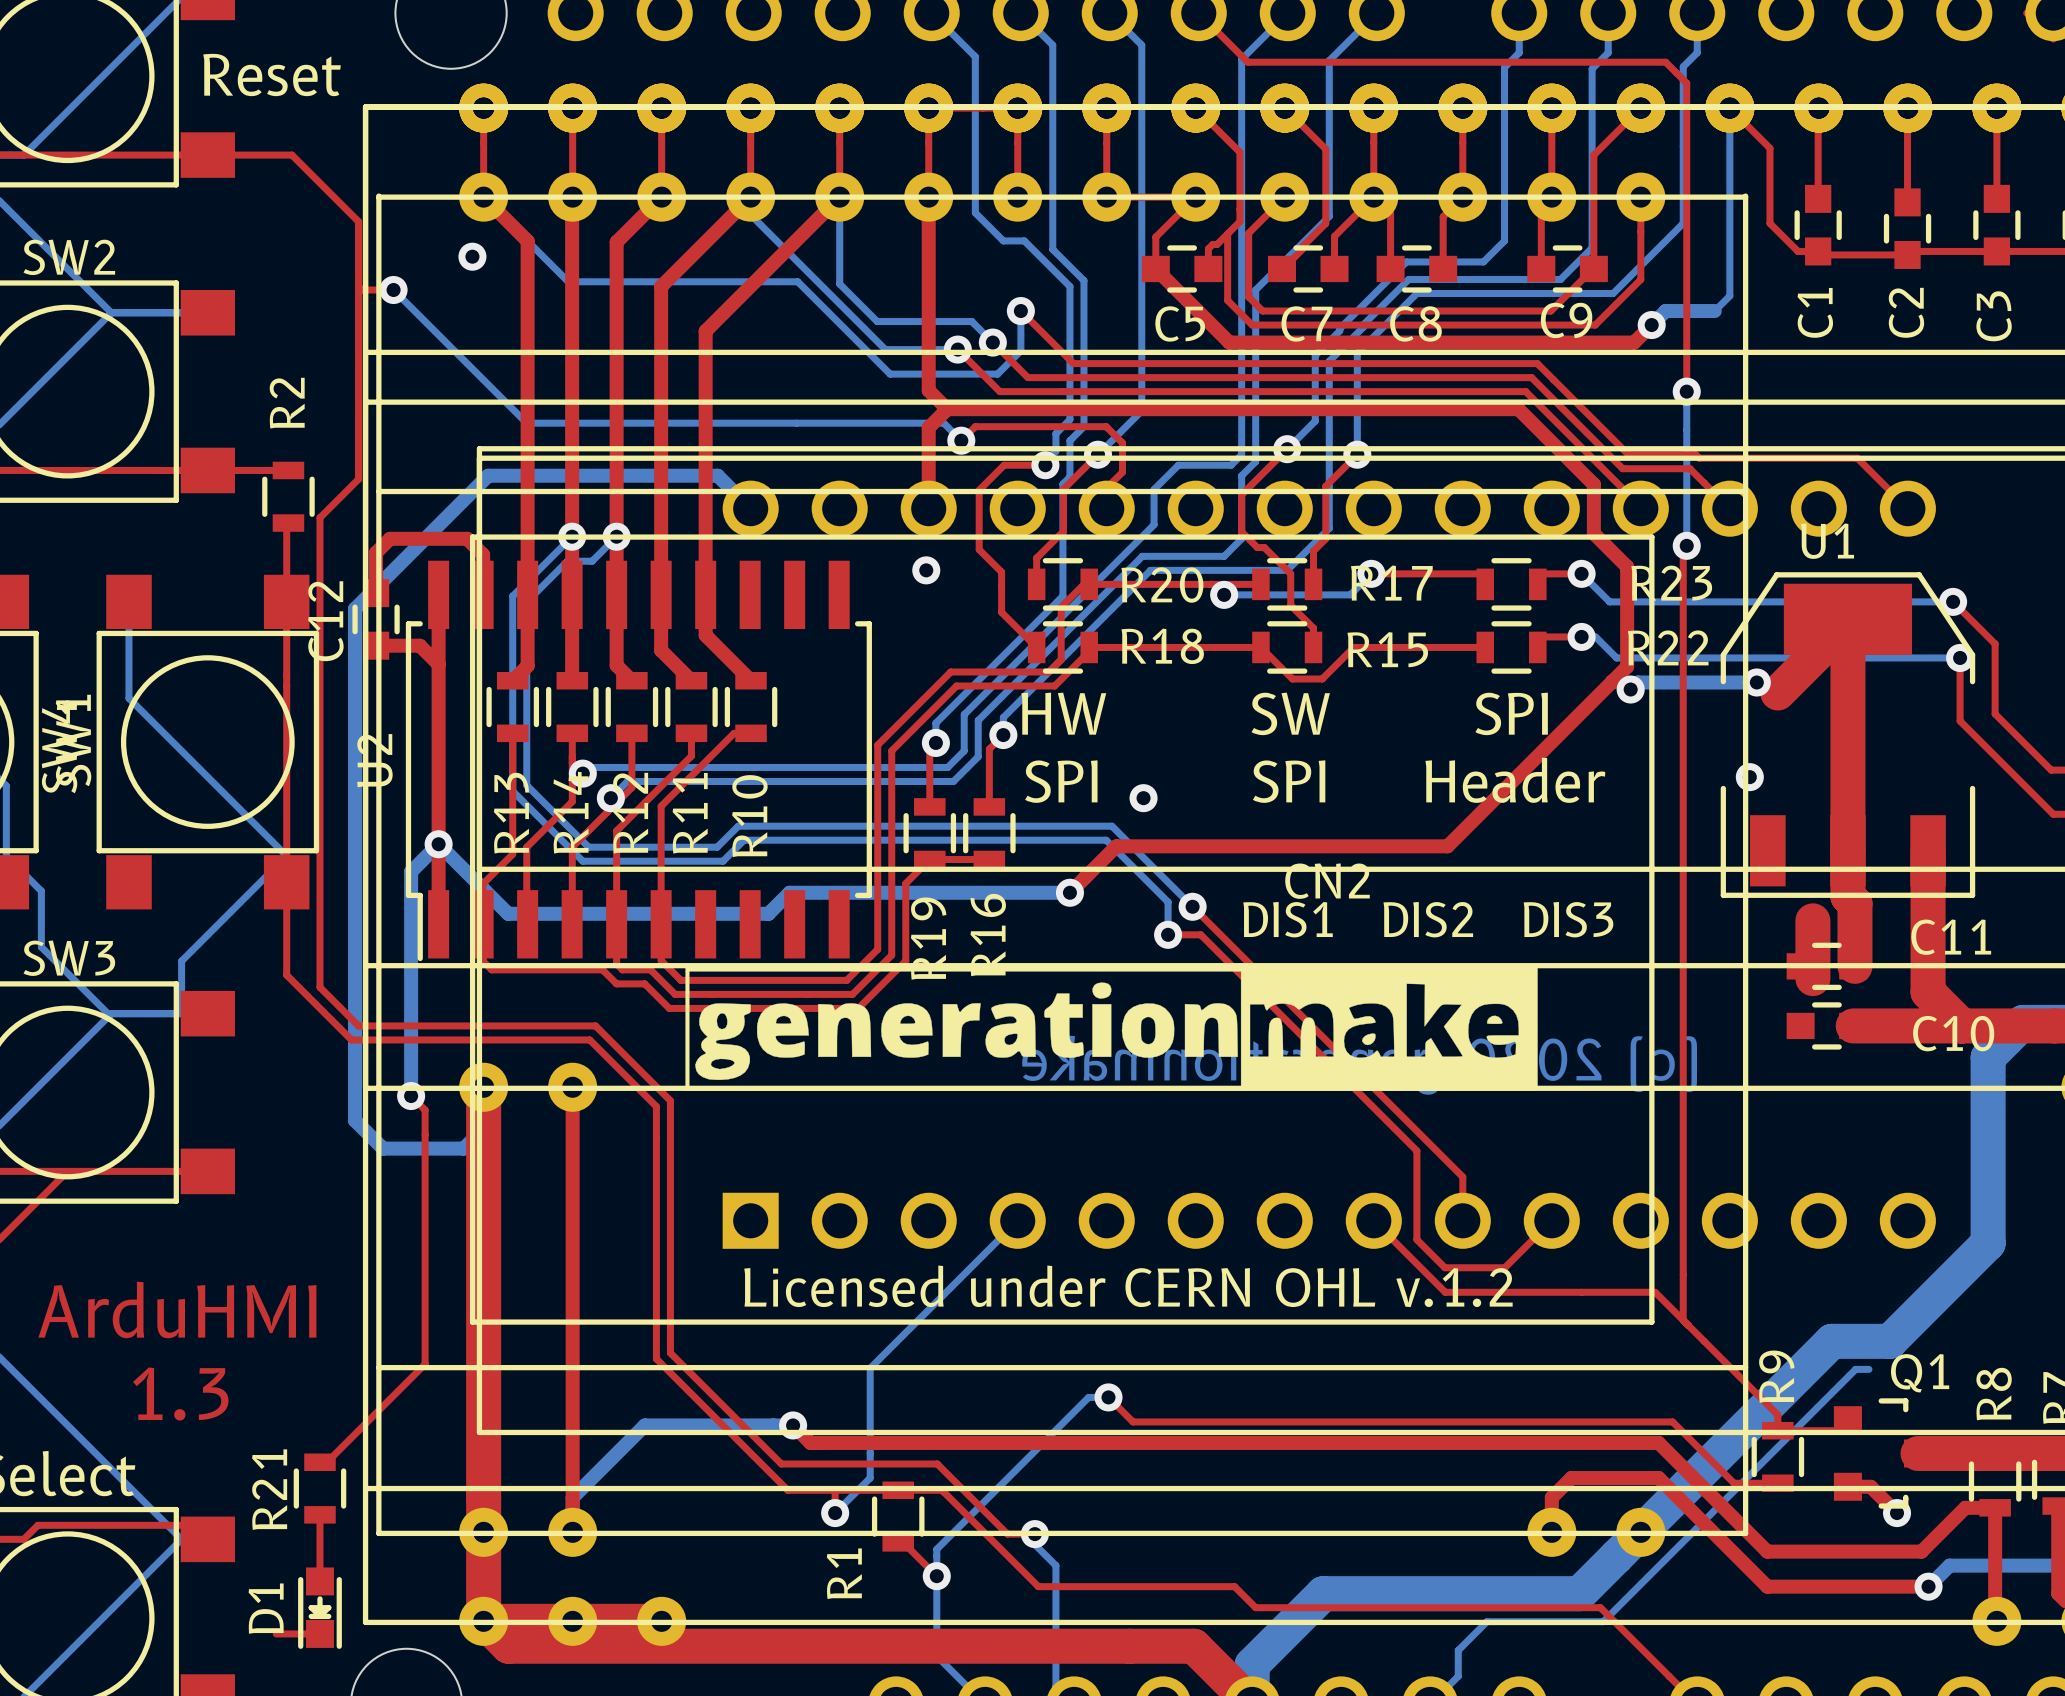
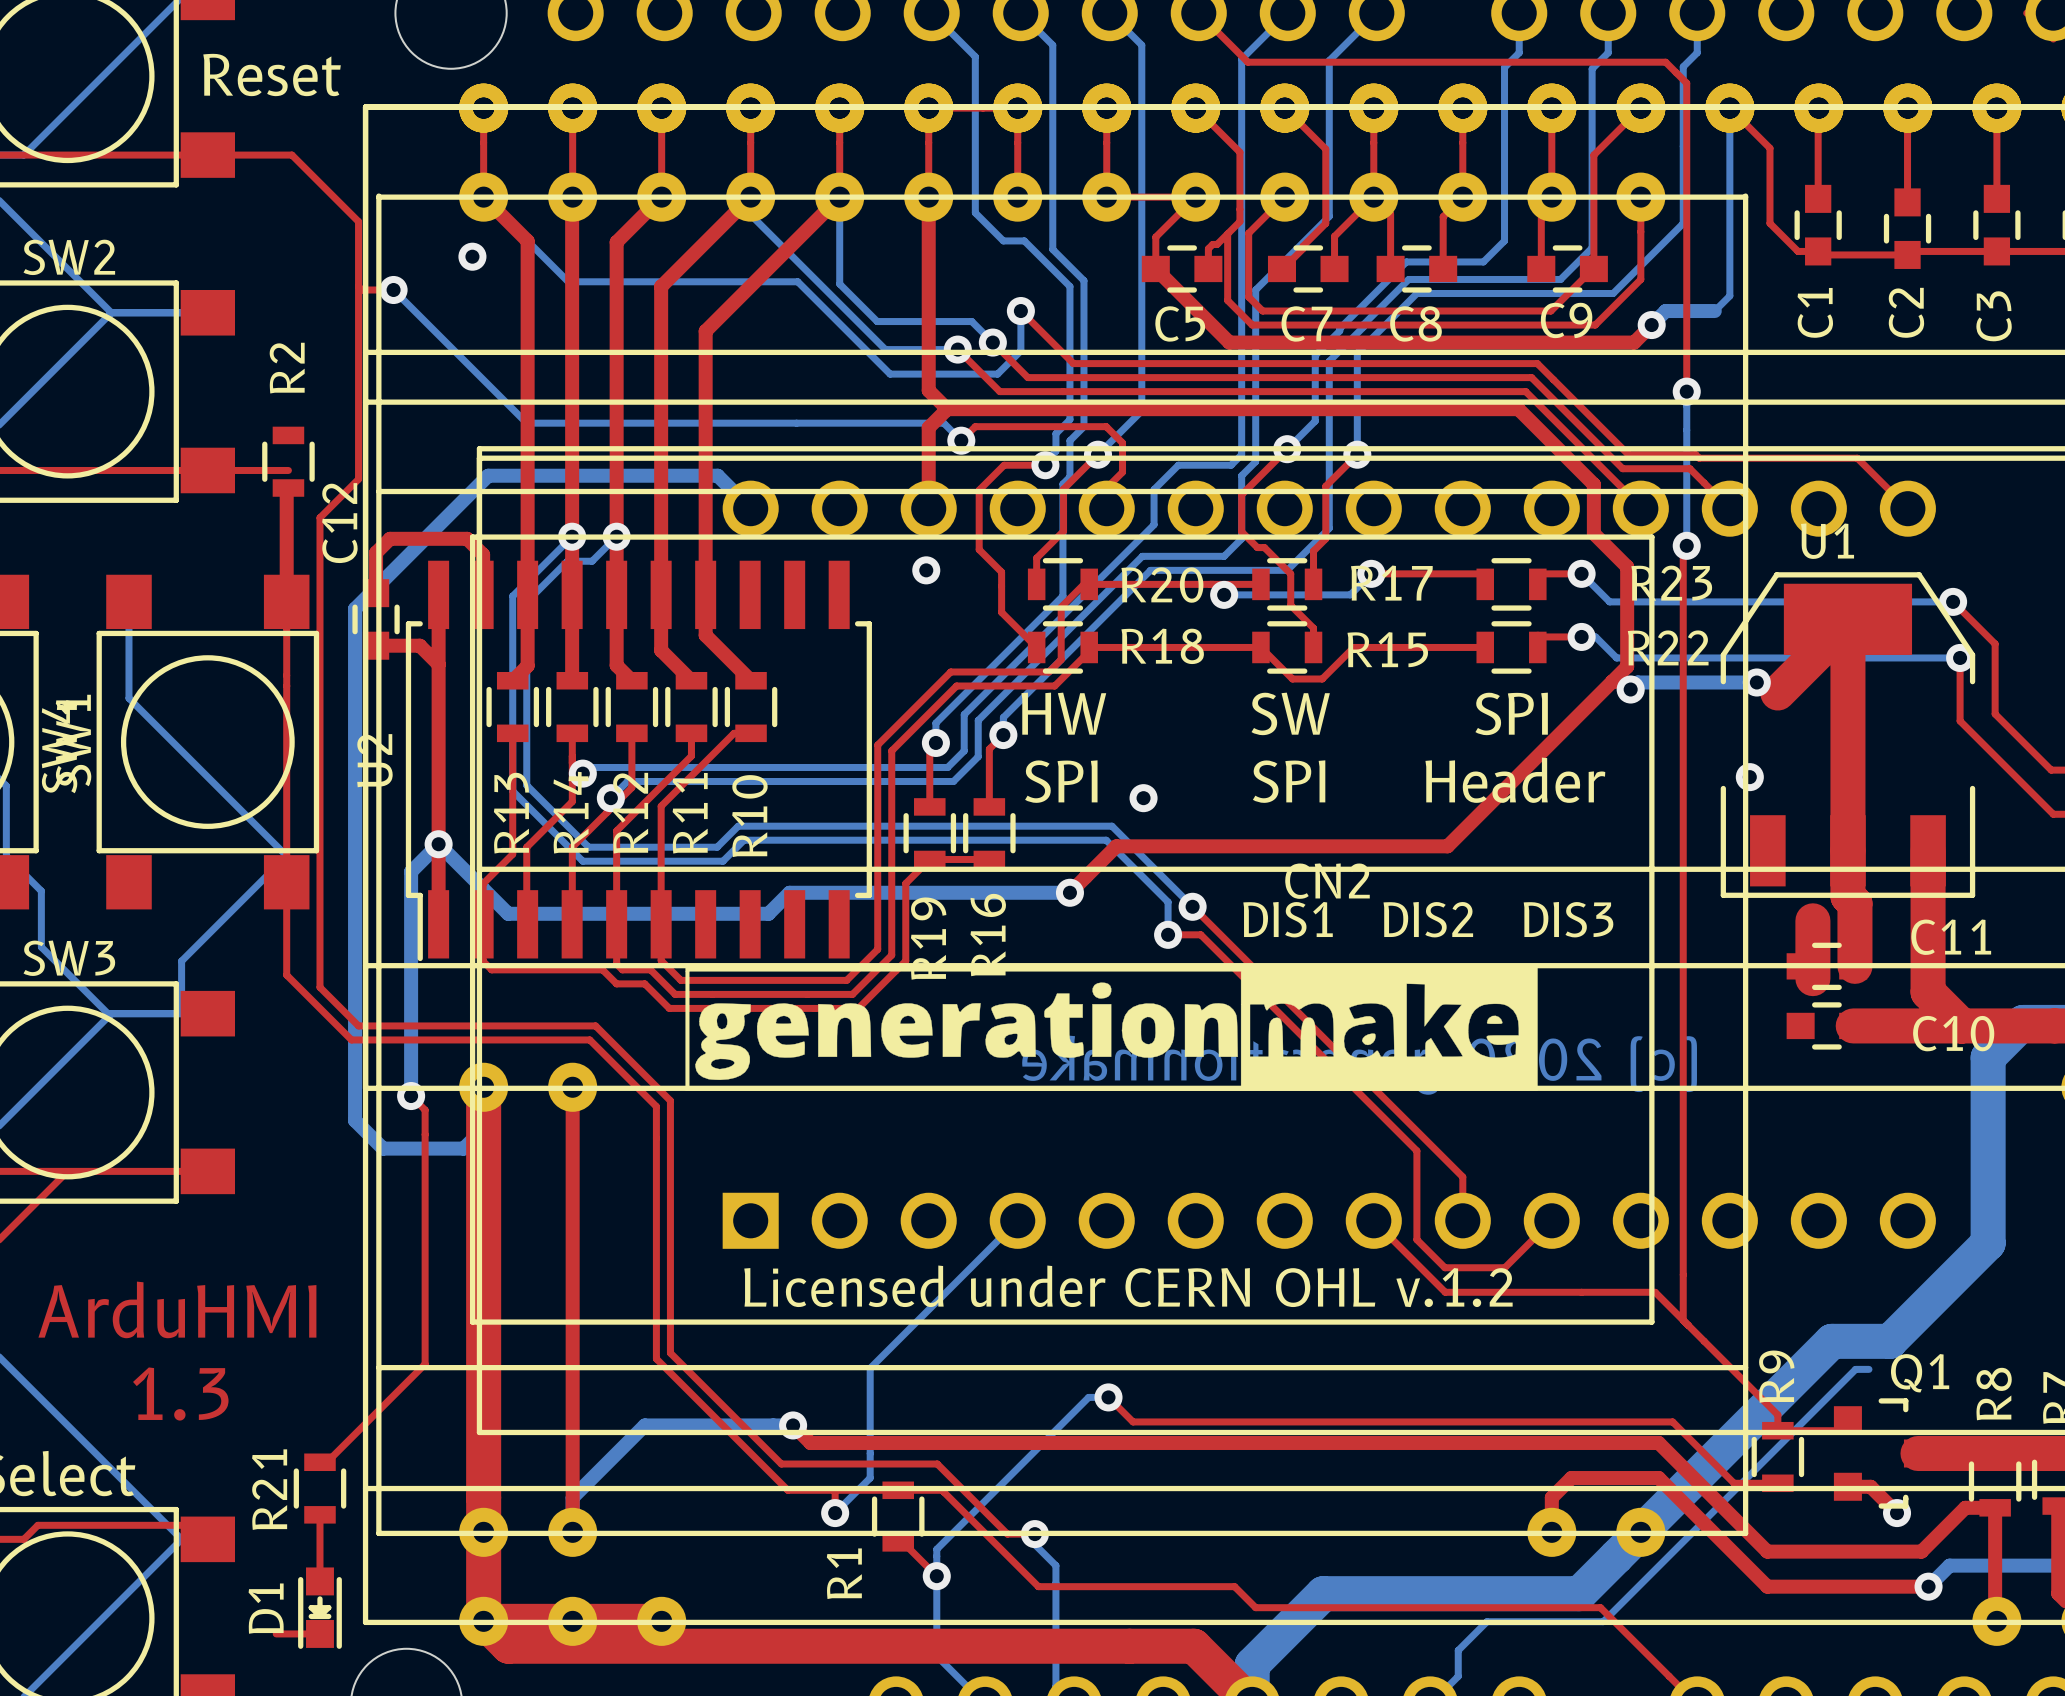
top track: none -> (288, 488) (286, 489) (286, 577)
R2 position: (288, 496) -> (288, 461)
C12 name position: C12 (325, 621) -> C12 (339, 523)

